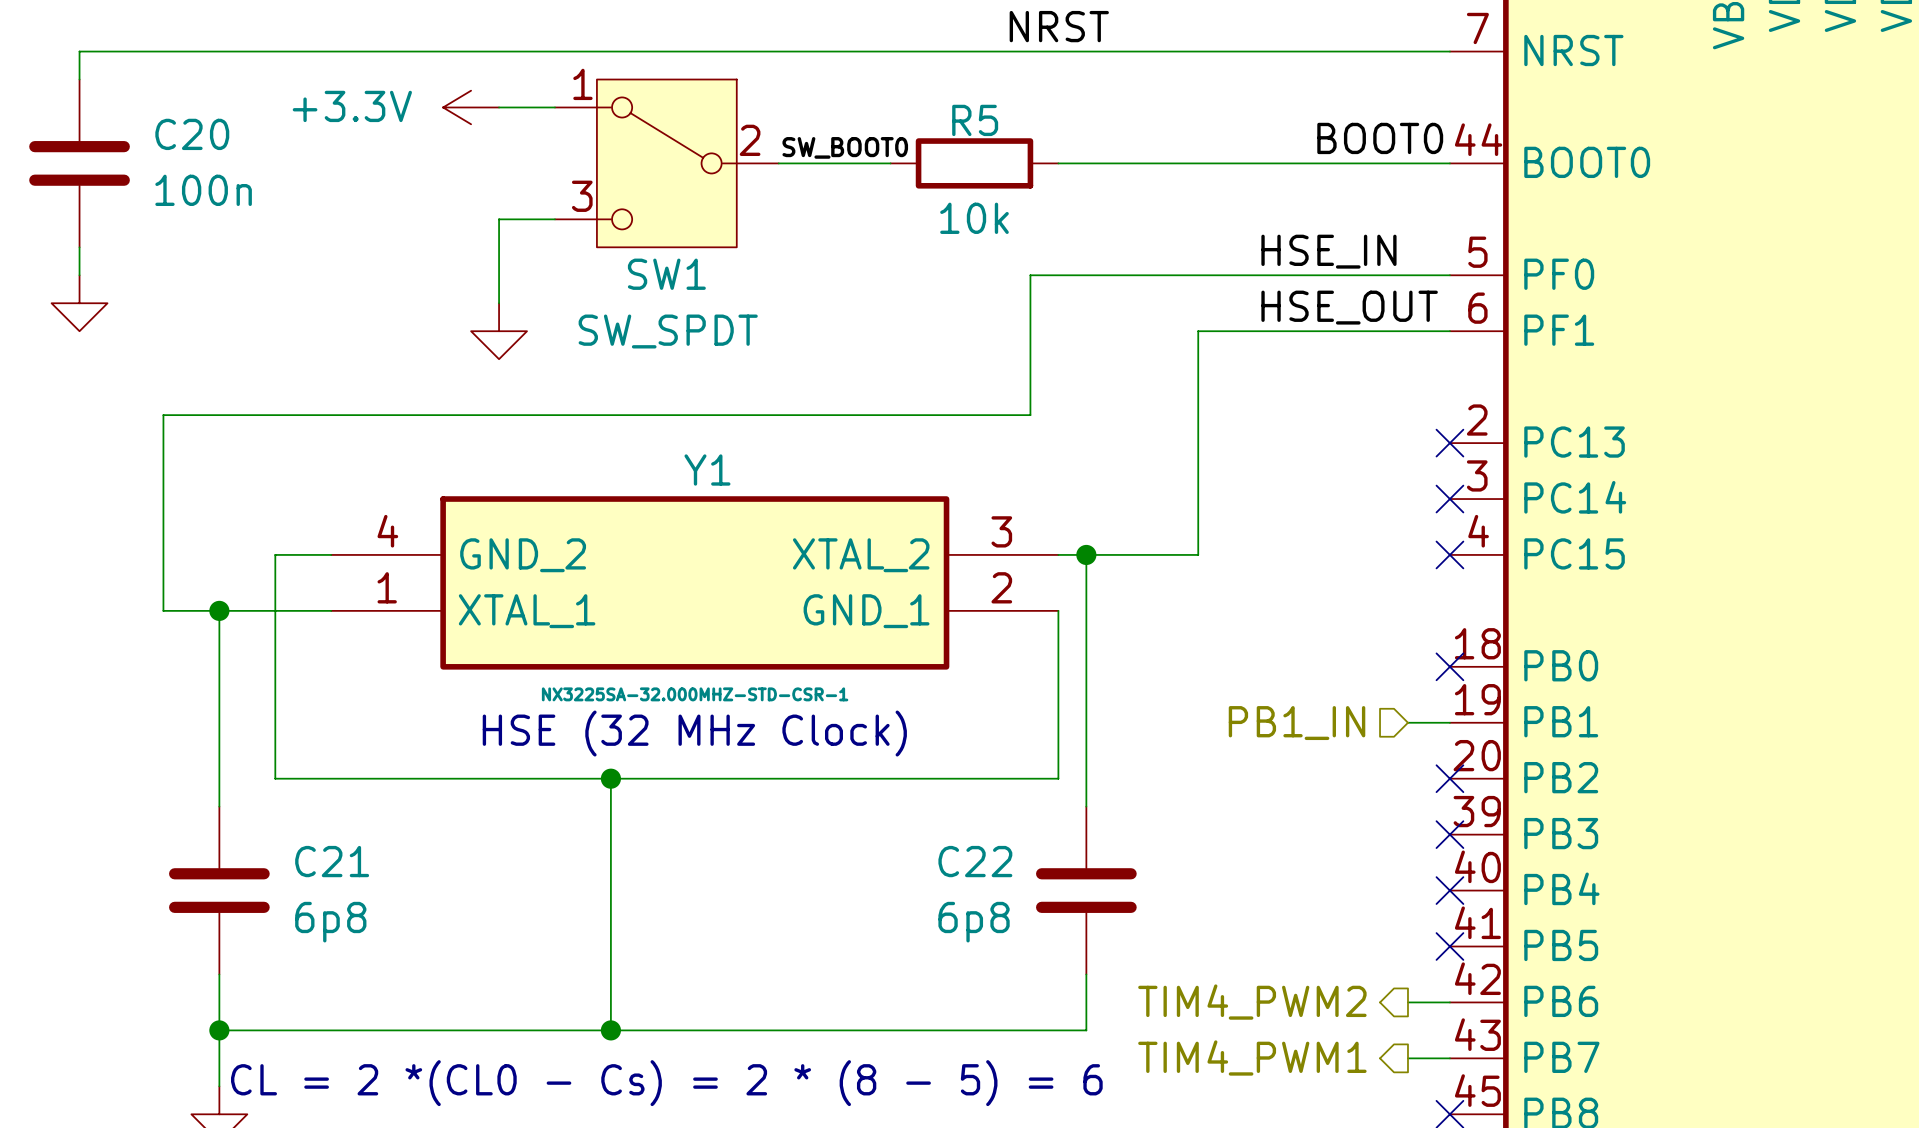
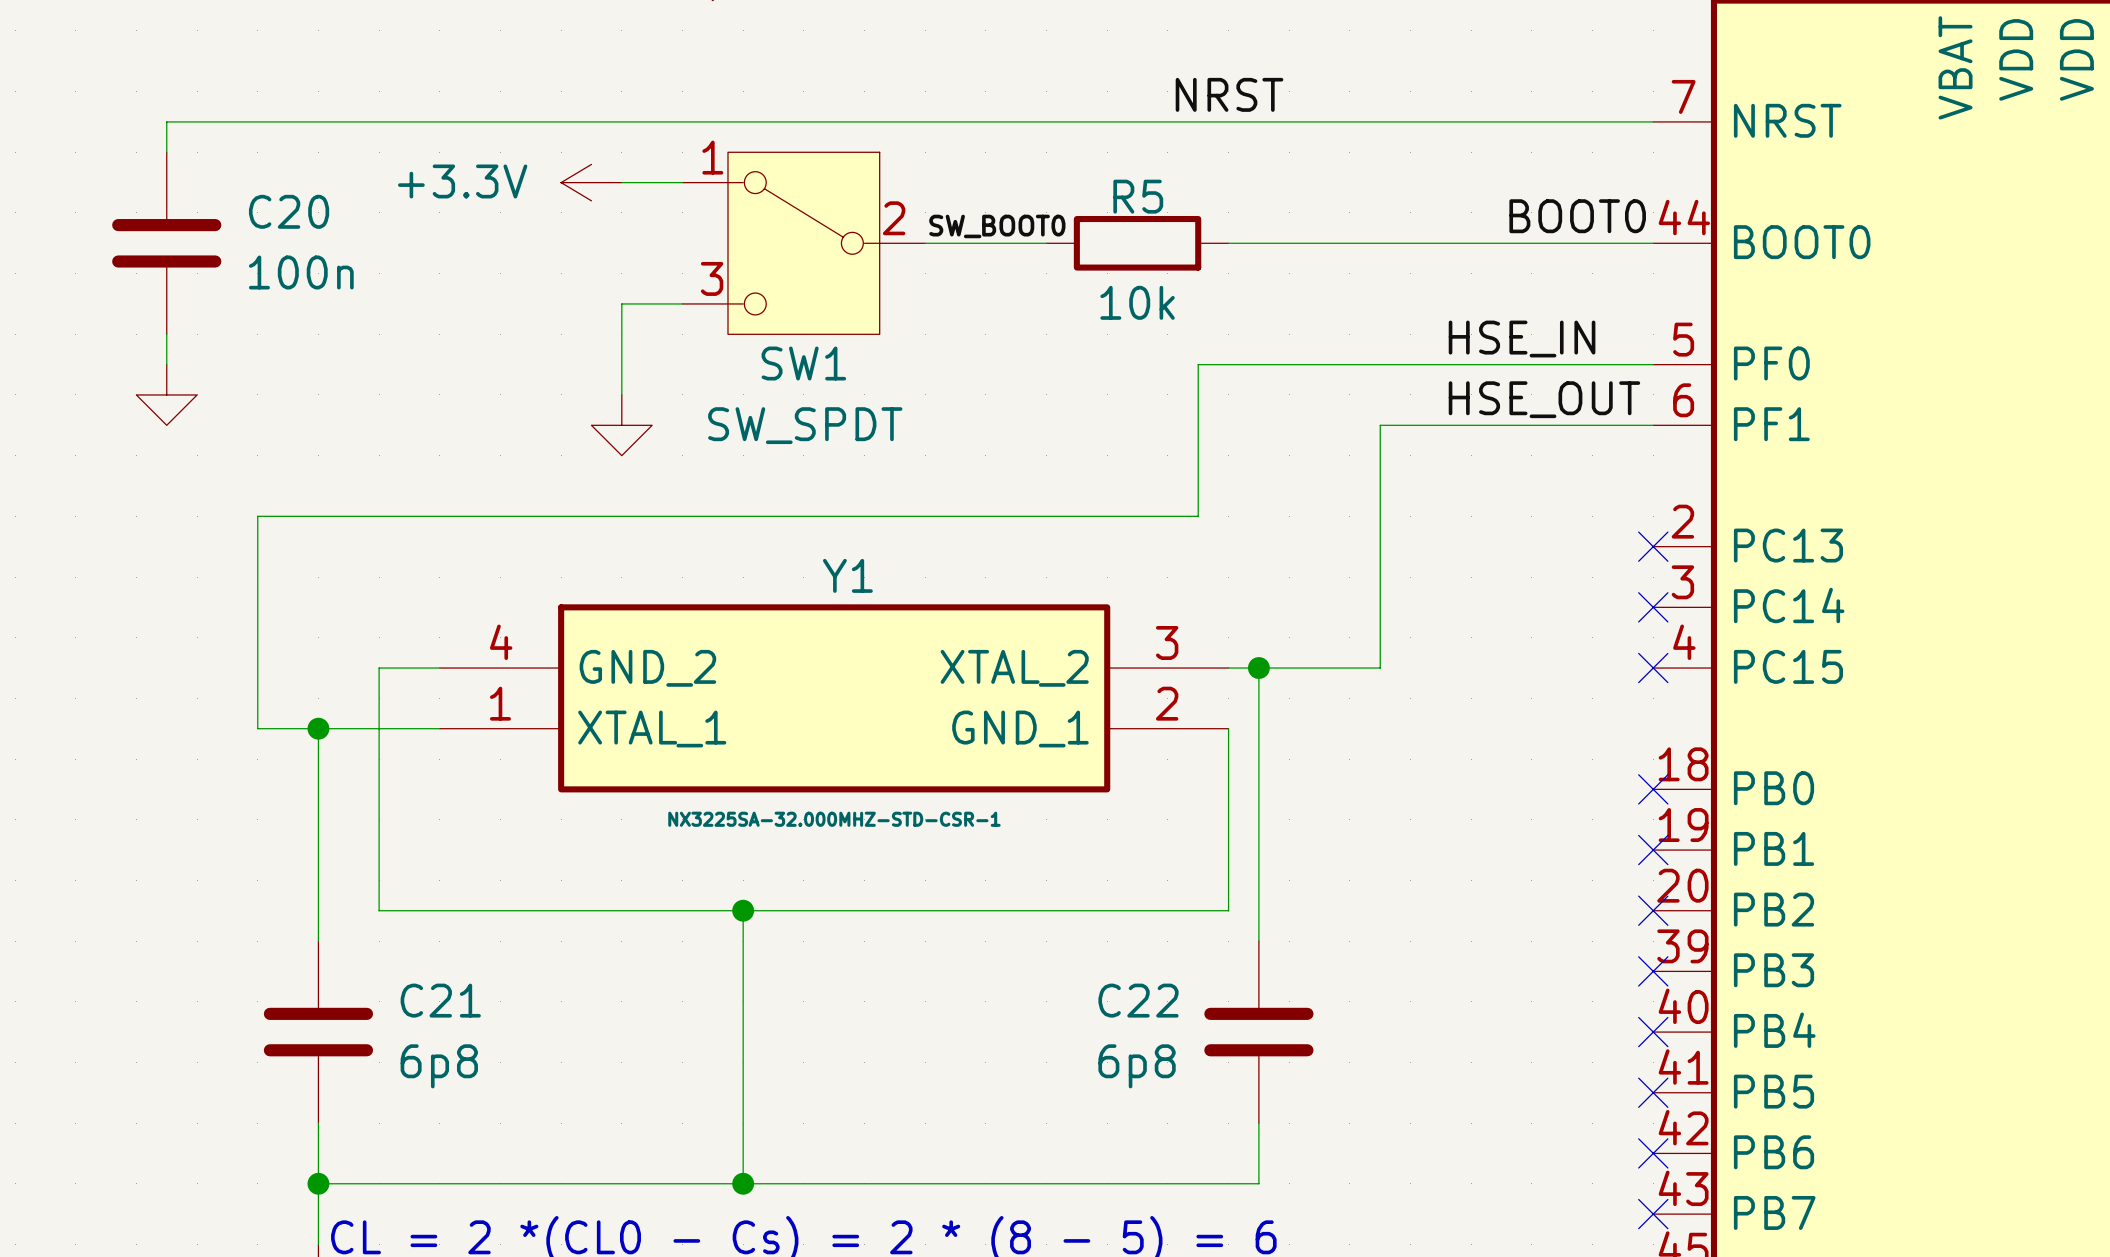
wire: (1407, 722) (1449, 722) -> none
no-connect mark: none -> (1653, 850)
hierarchical label: PB1_IN (1297, 723) -> none
text: HSE (32 MHz Clock) (694, 733) -> none
hierarchical label: TIM4_PWM2 (1252, 1002) -> none
wire: (1407, 1002) (1449, 1002) -> none
no-connect mark: none -> (1653, 1153)
hierarchical label: TIM4_PWM1 (1252, 1057) -> none
wire: (1407, 1058) (1449, 1058) -> none
no-connect mark: none -> (1653, 1214)

